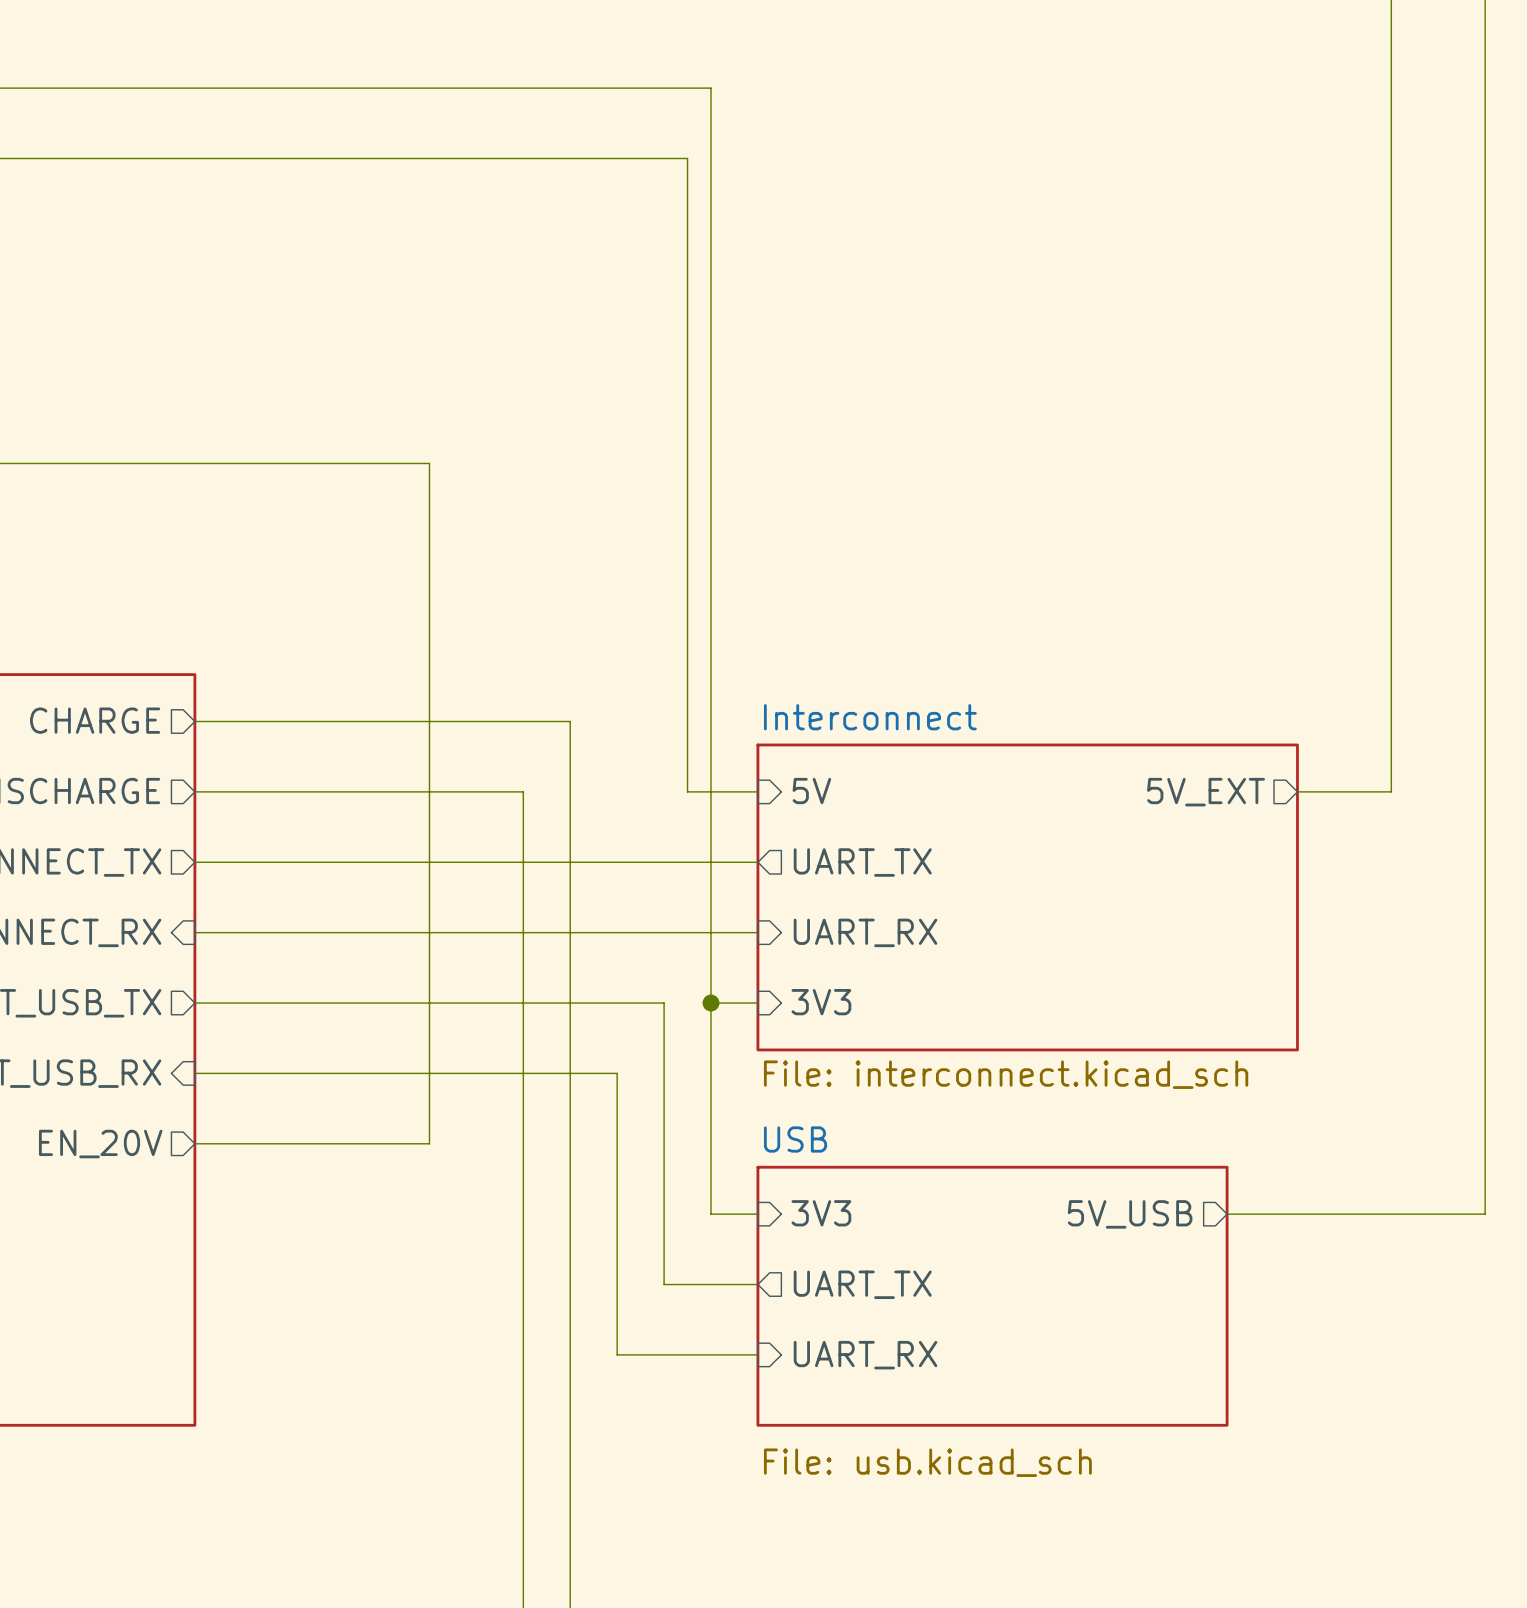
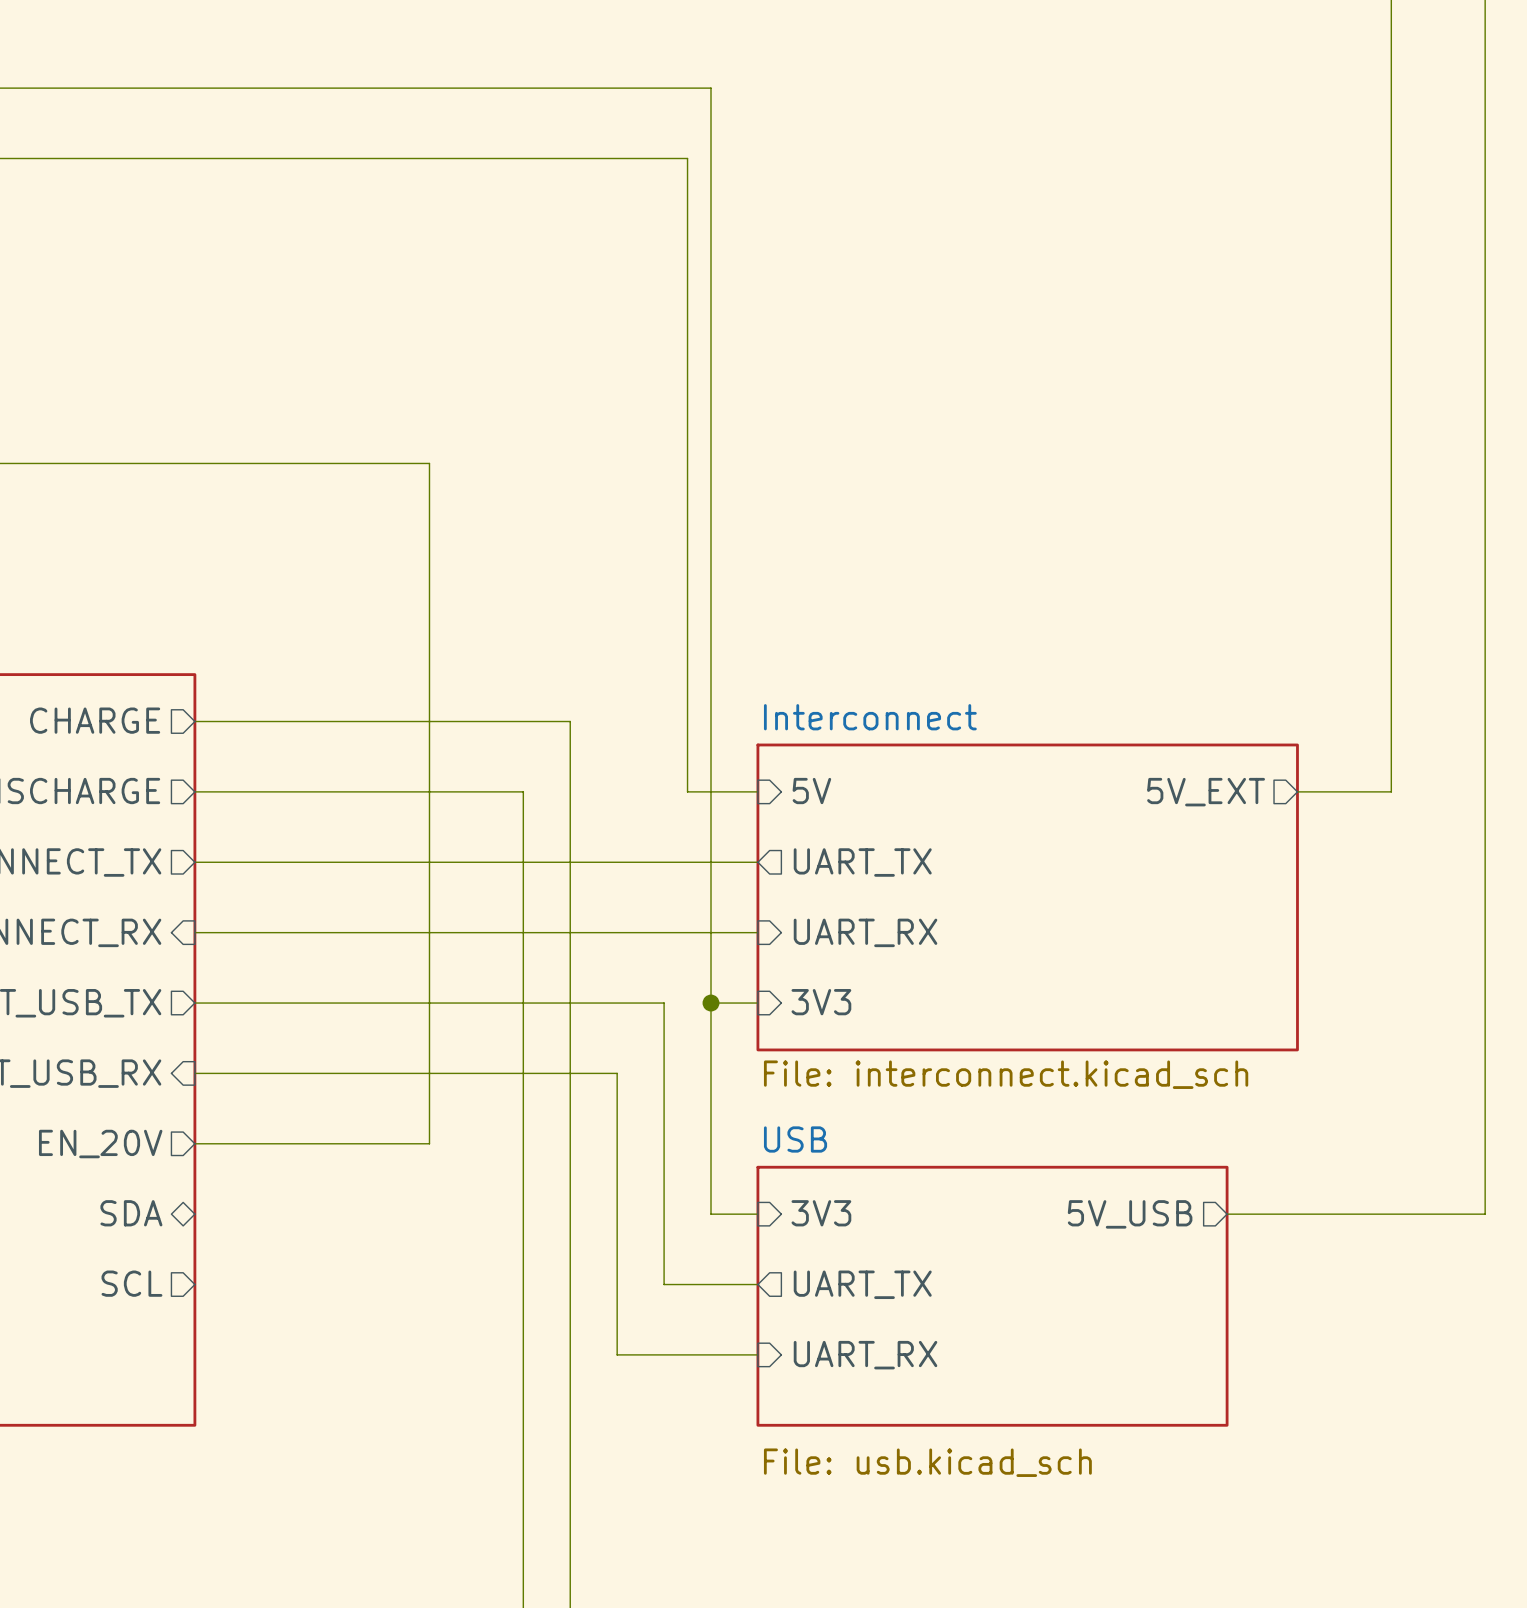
sheet pin: none -> SDA (131, 1213)
sheet pin: none -> SCL (131, 1283)

